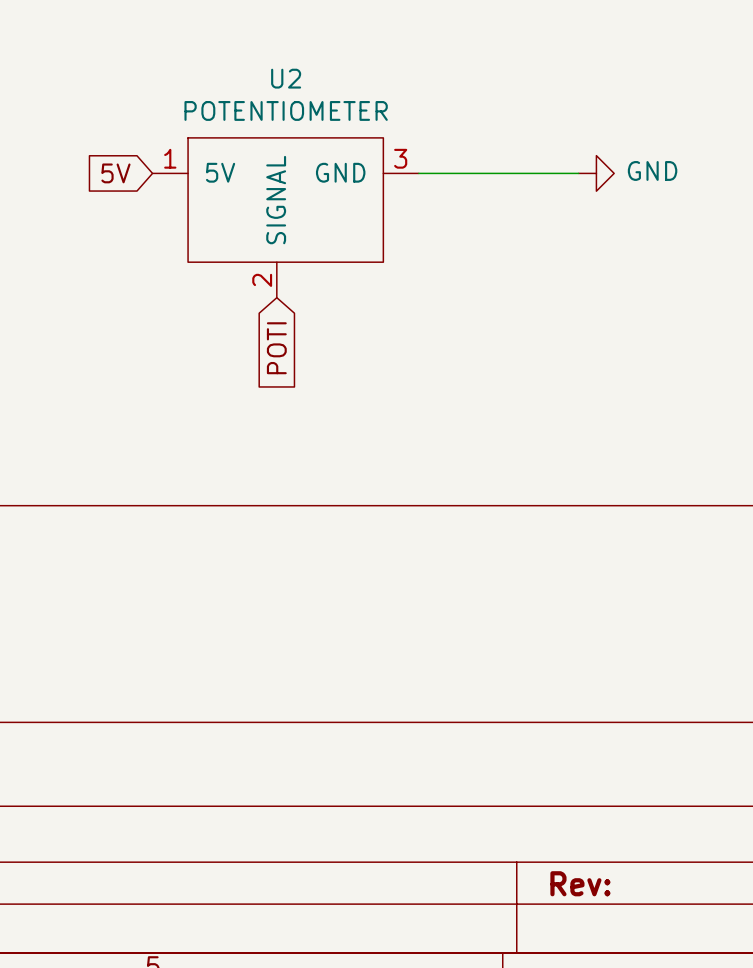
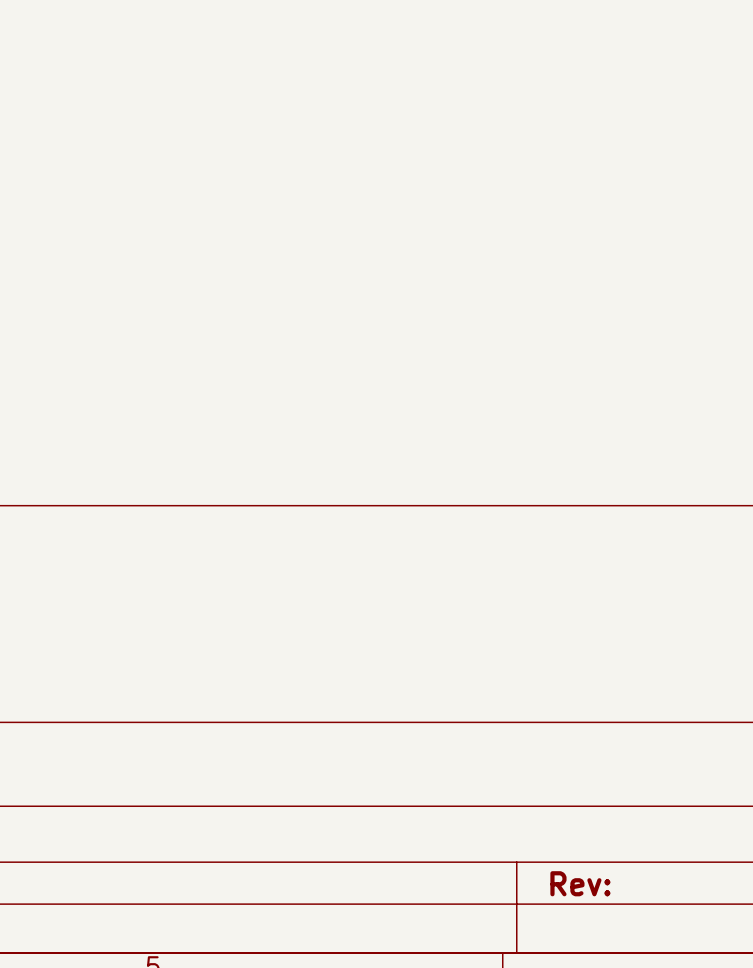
global label: 5V (115, 173) -> none
wire: (418, 173) (578, 173) -> none
power symbol: GND (596, 173) -> none
U2: POTENTIOMETER (285, 217) -> none
global label: POTI (276, 348) -> none

